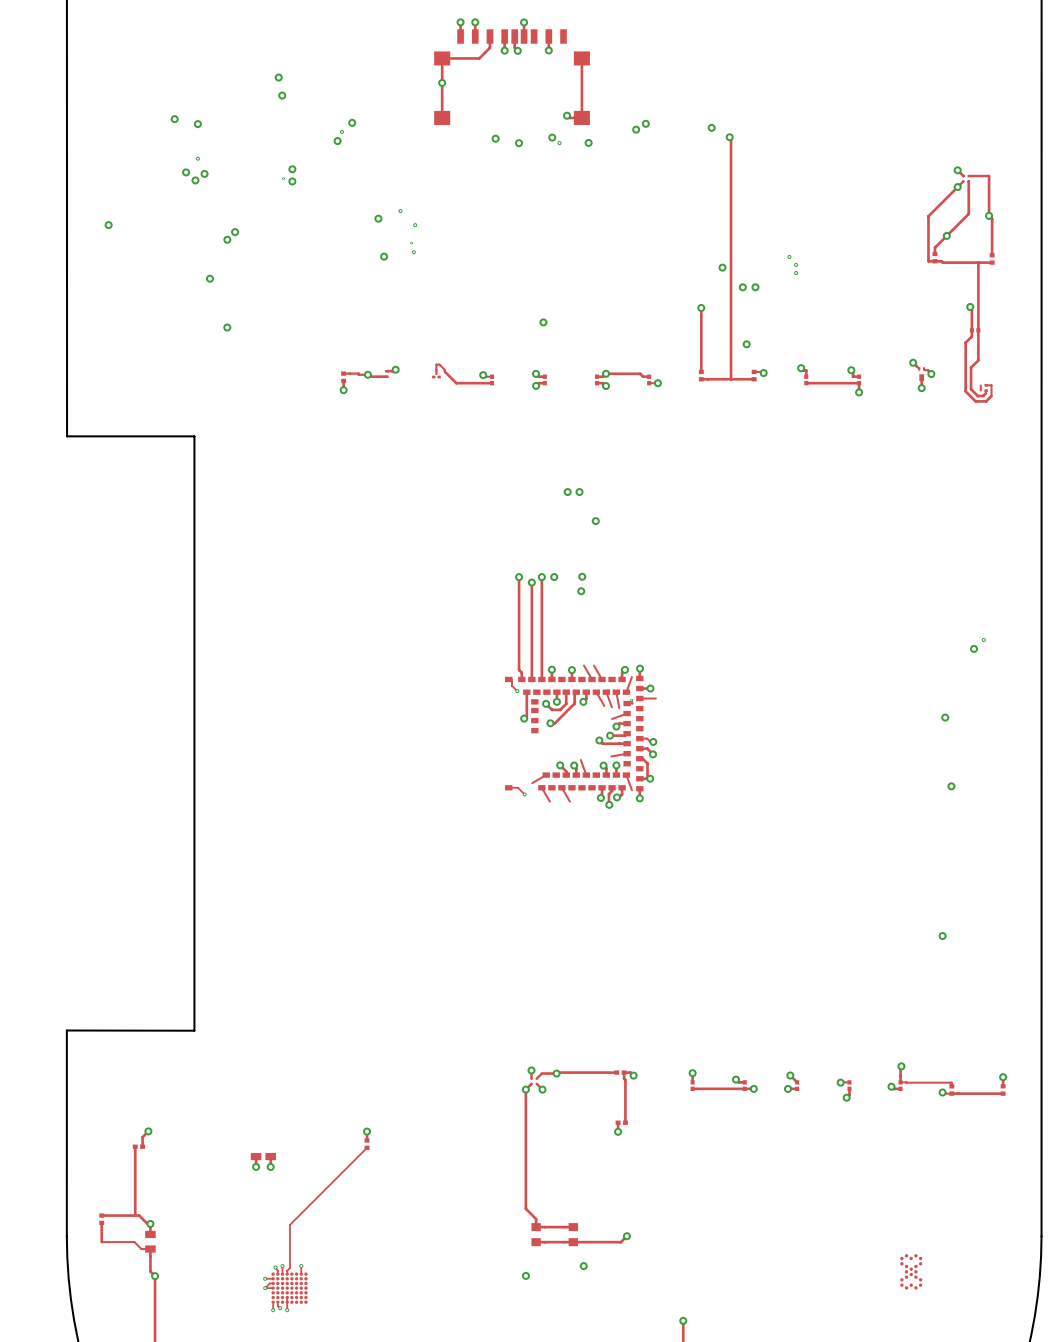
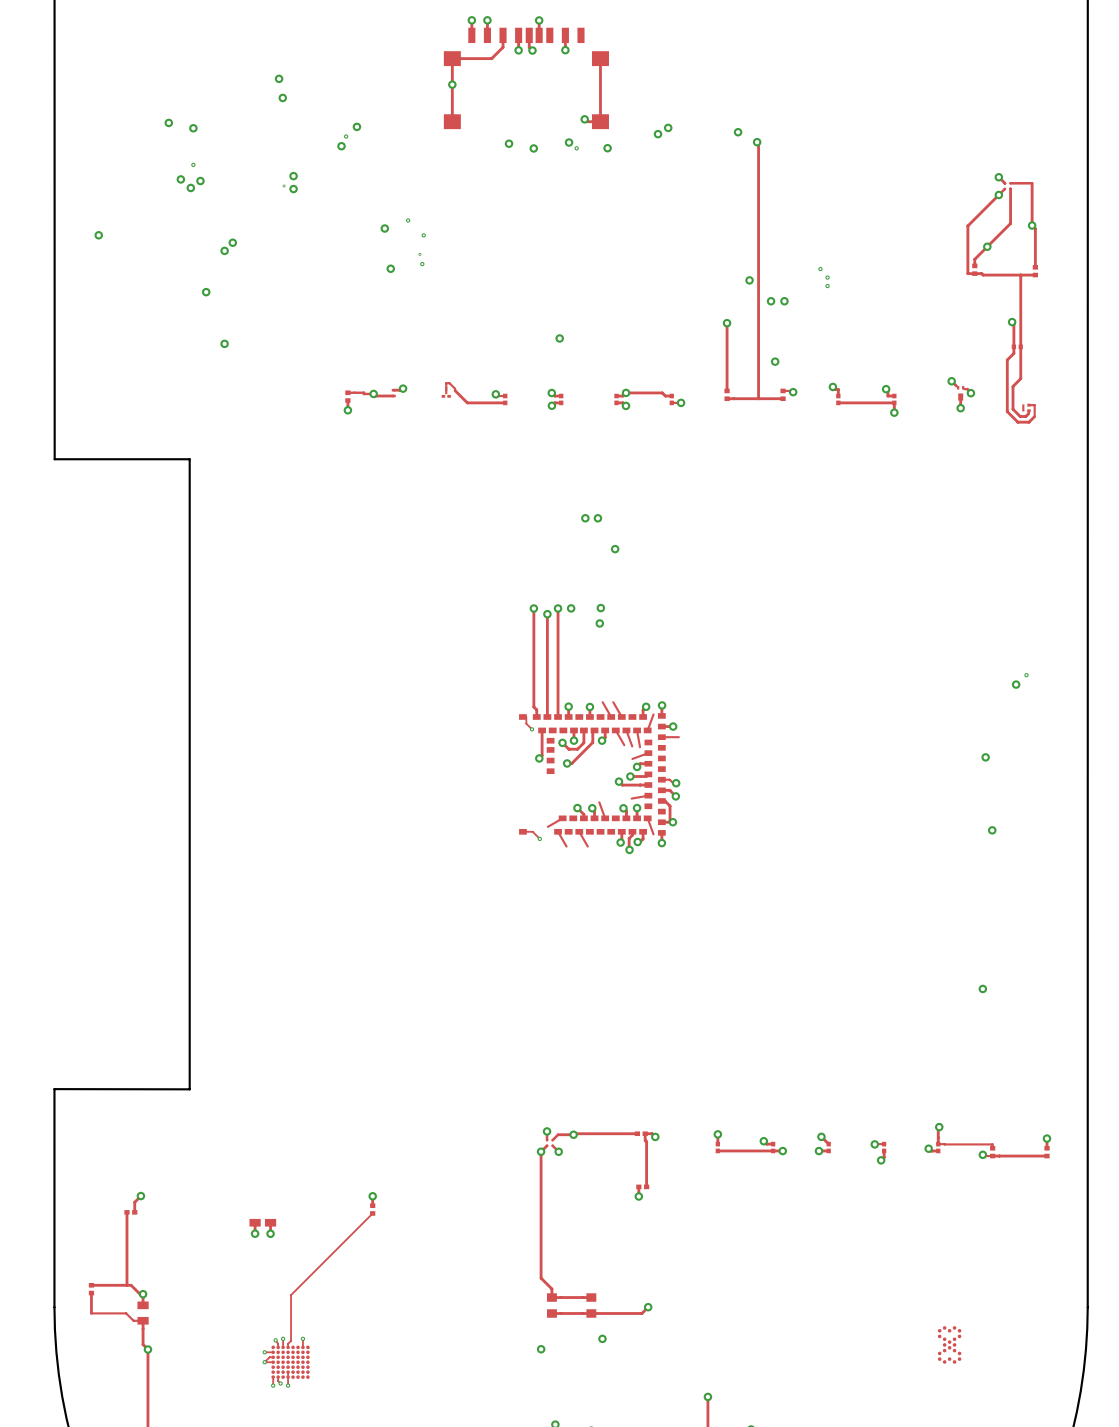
track: (631, 700) (632, 703) (627, 703) -> none
via: (631, 700) -> none

